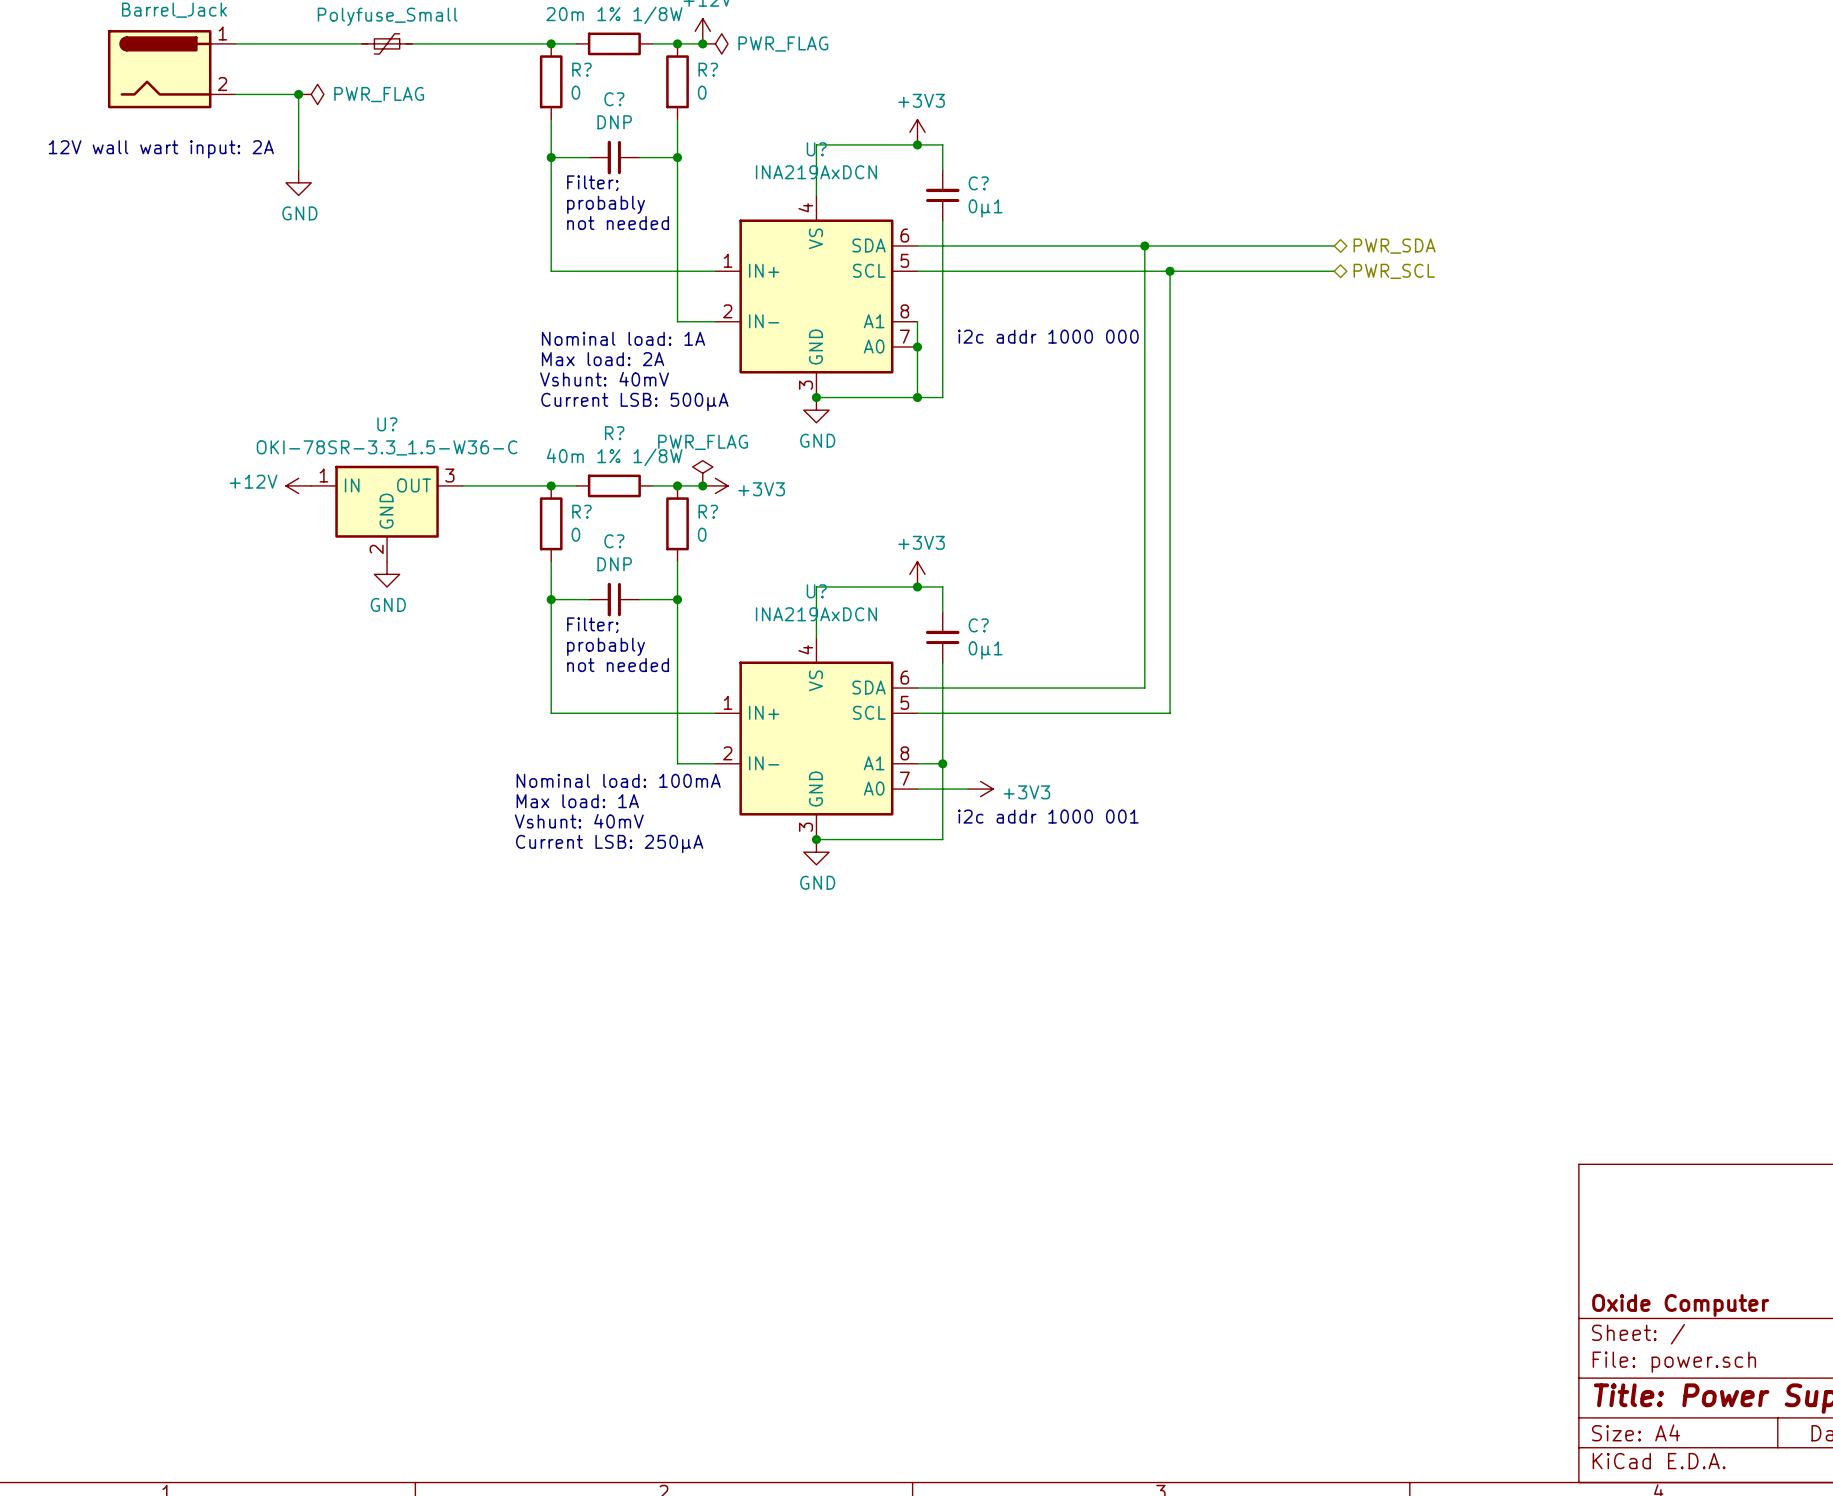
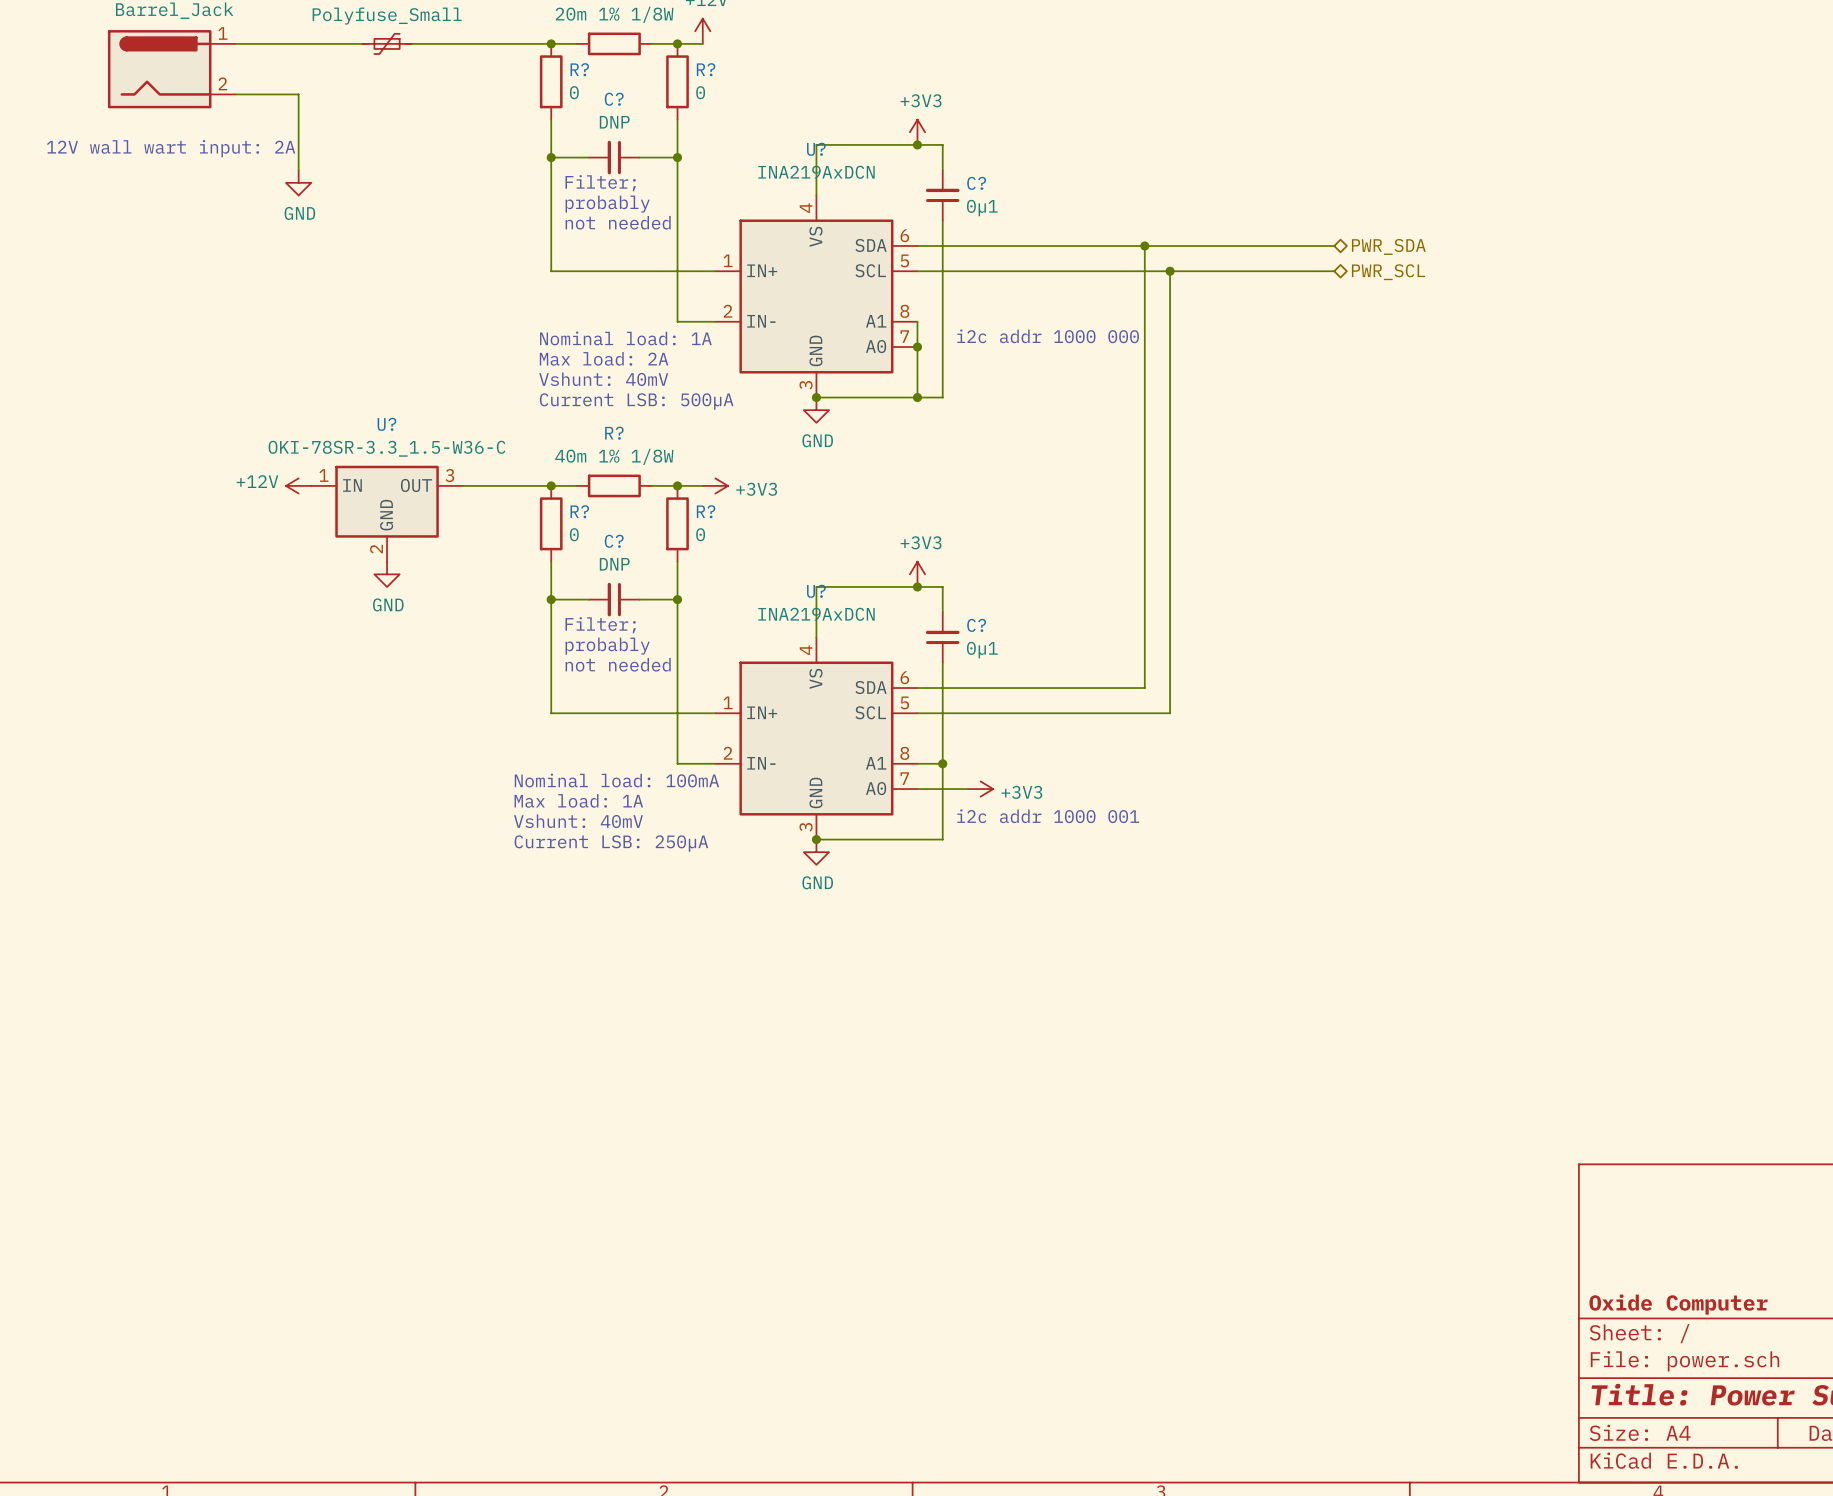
junction: (702, 43) -> none
power symbol: PWR_FLAG (715, 43) -> none
junction: (298, 94) -> none
power symbol: PWR_FLAG (311, 94) -> none
power symbol: PWR_FLAG (702, 473) -> none
junction: (702, 485) -> none

